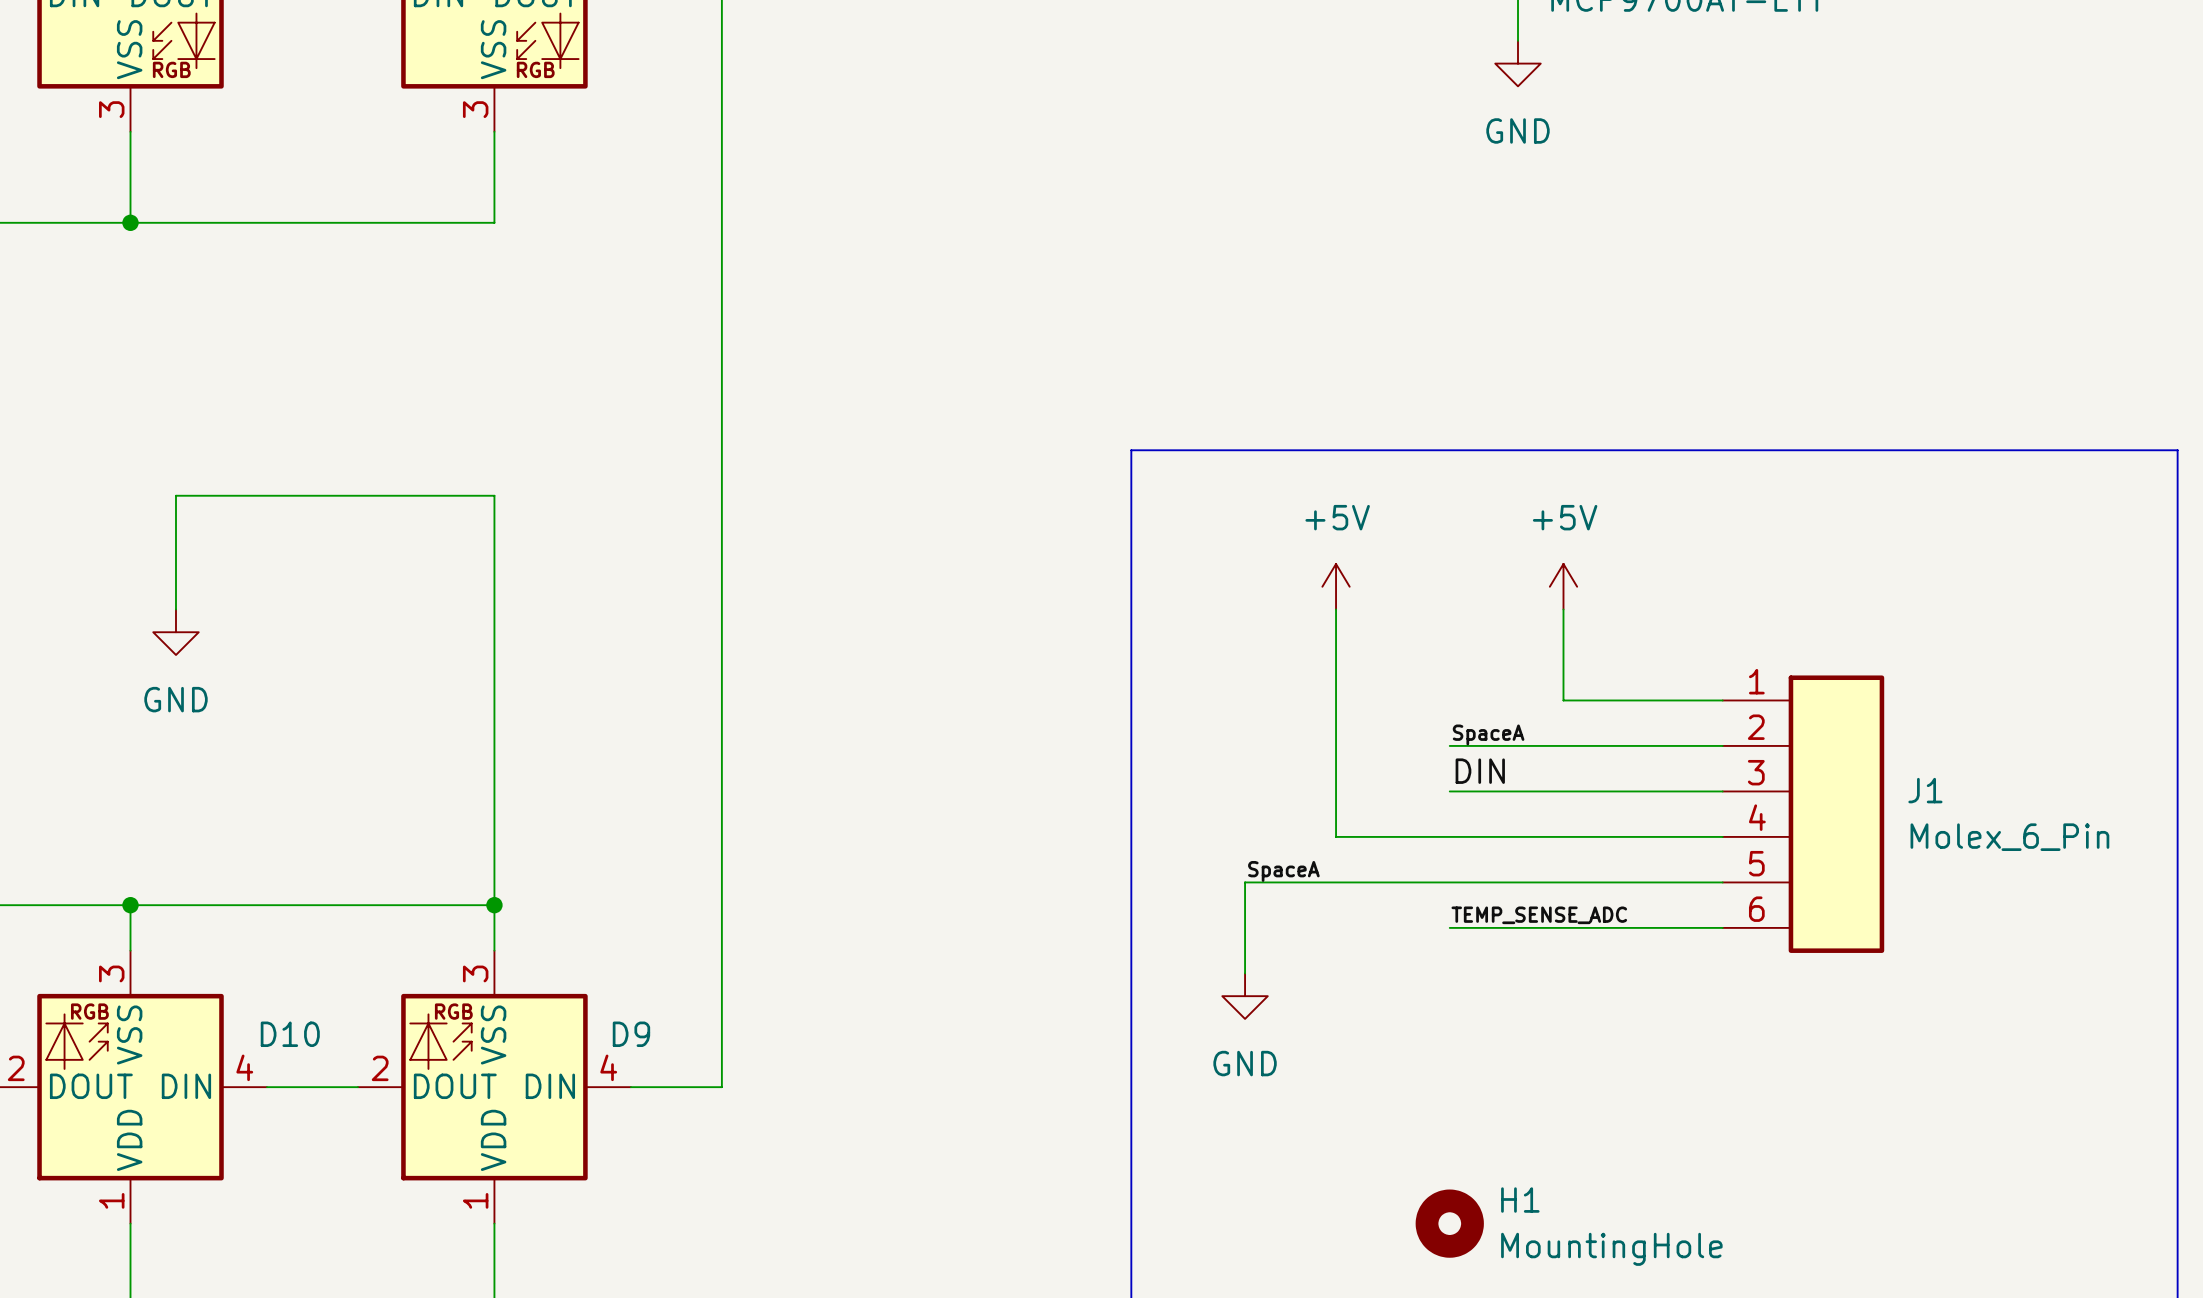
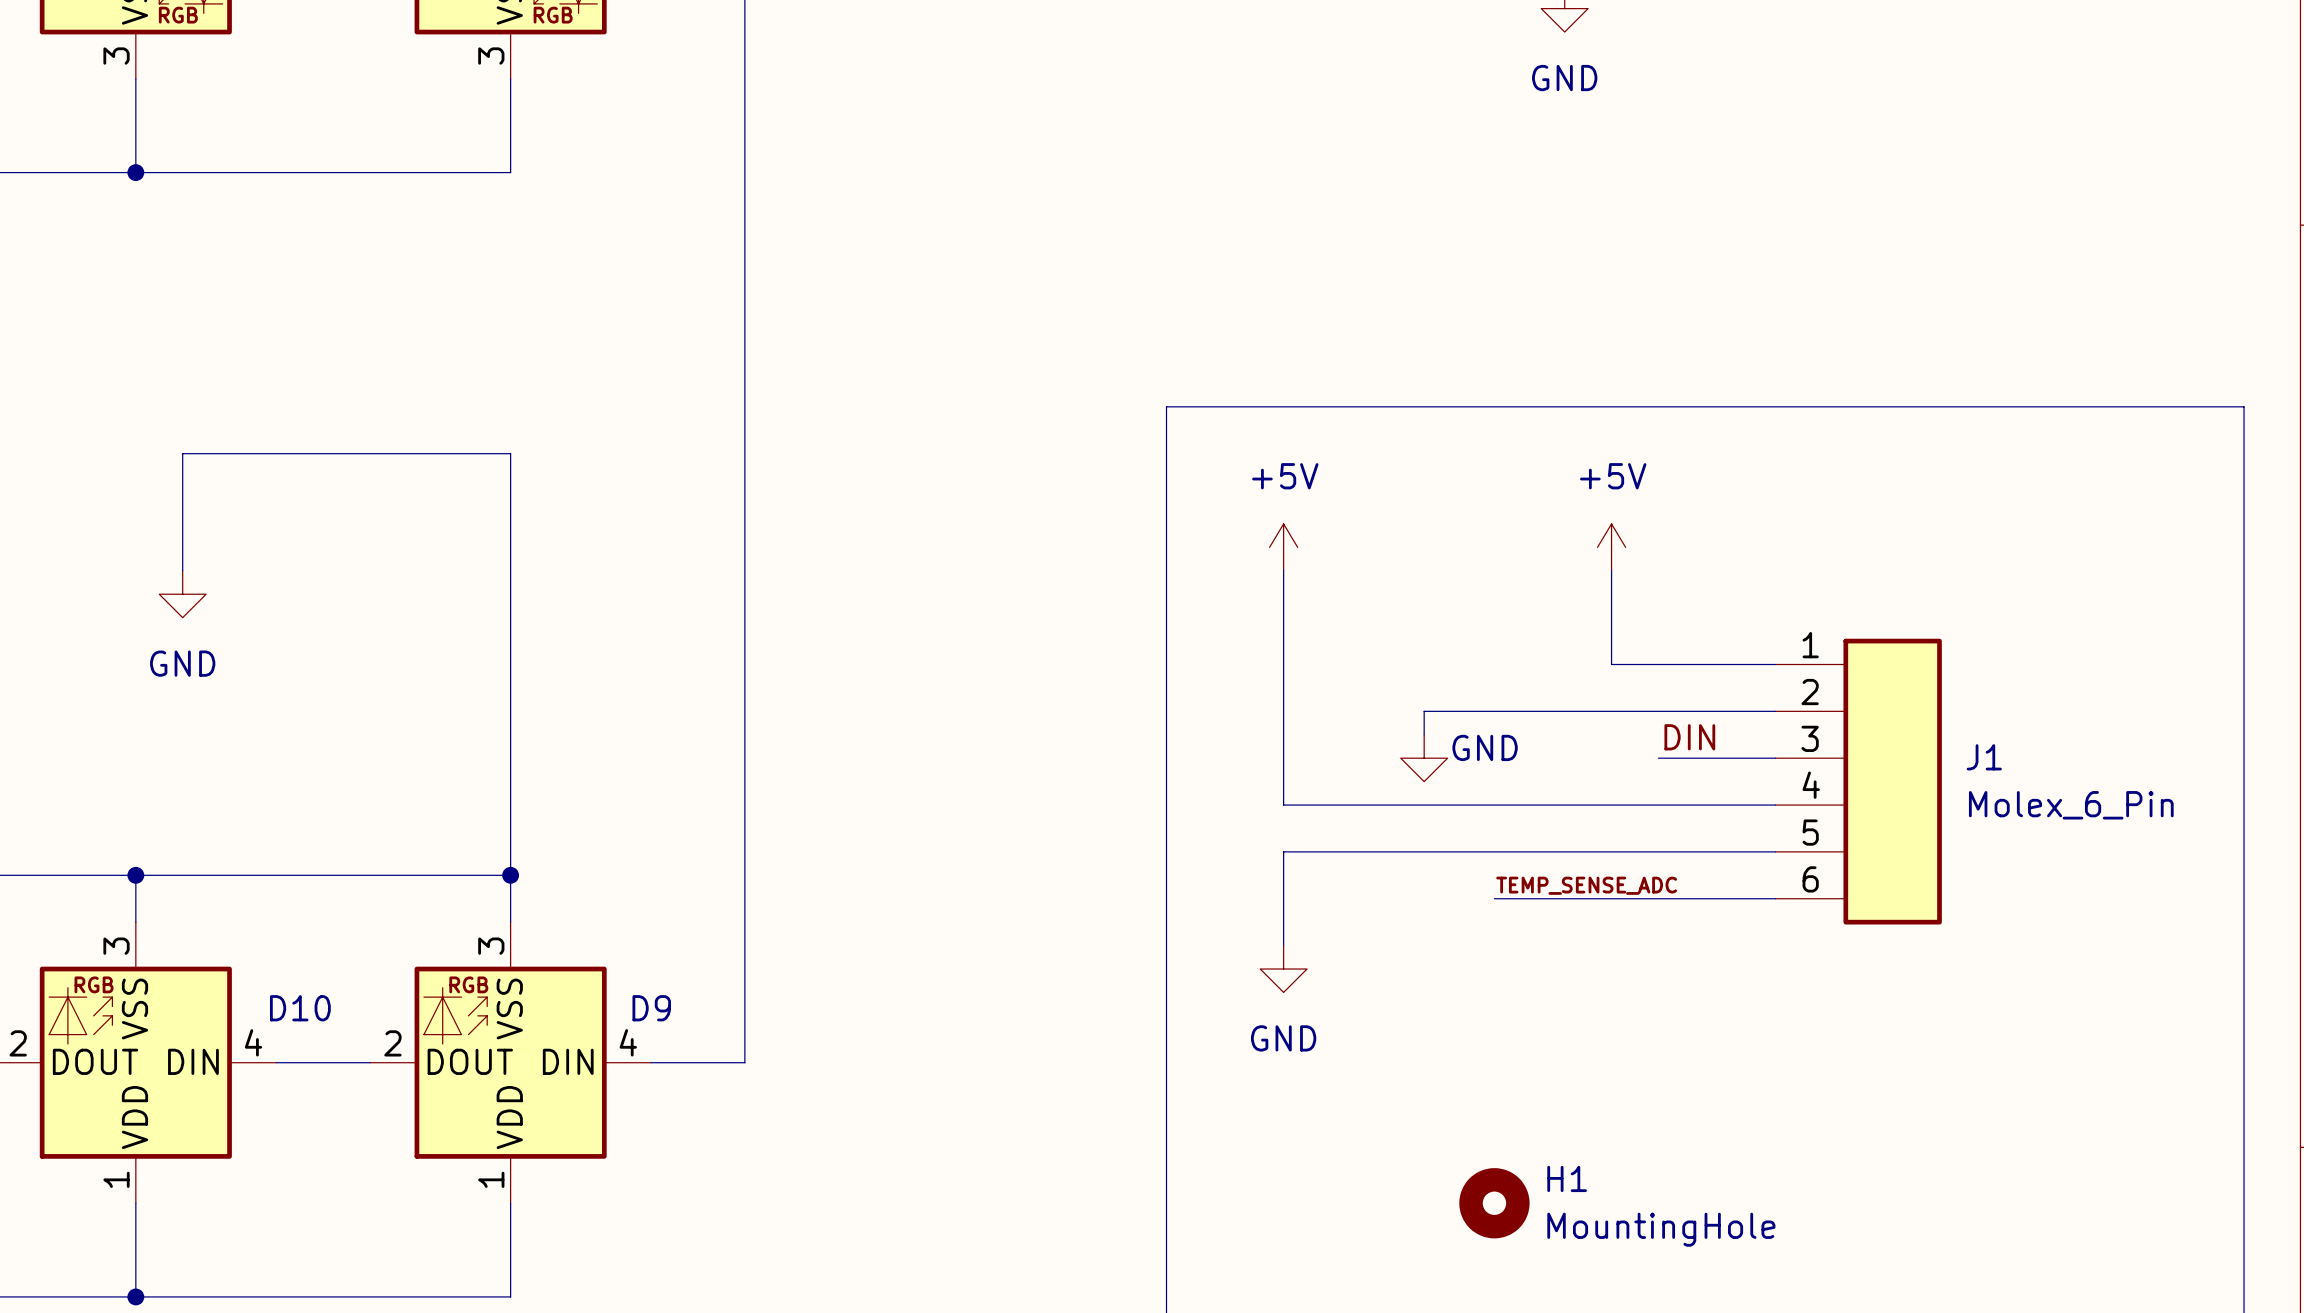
power symbol position: +5V (1336, 586) -> +5V (1283, 547)
wire: (1336, 609) (1336, 836) -> (1283, 570) (1283, 805) (1377, 805)
label: SpaceA (1488, 734) -> none
wire: none -> (1494, 711) (1424, 711) (1424, 734)
label position: DIN (1480, 771) -> DIN (1689, 737)
power symbol: none -> GND (1424, 758)
wire: (1449, 791) (1608, 791) -> none
label: SpaceA (1283, 871) -> none

